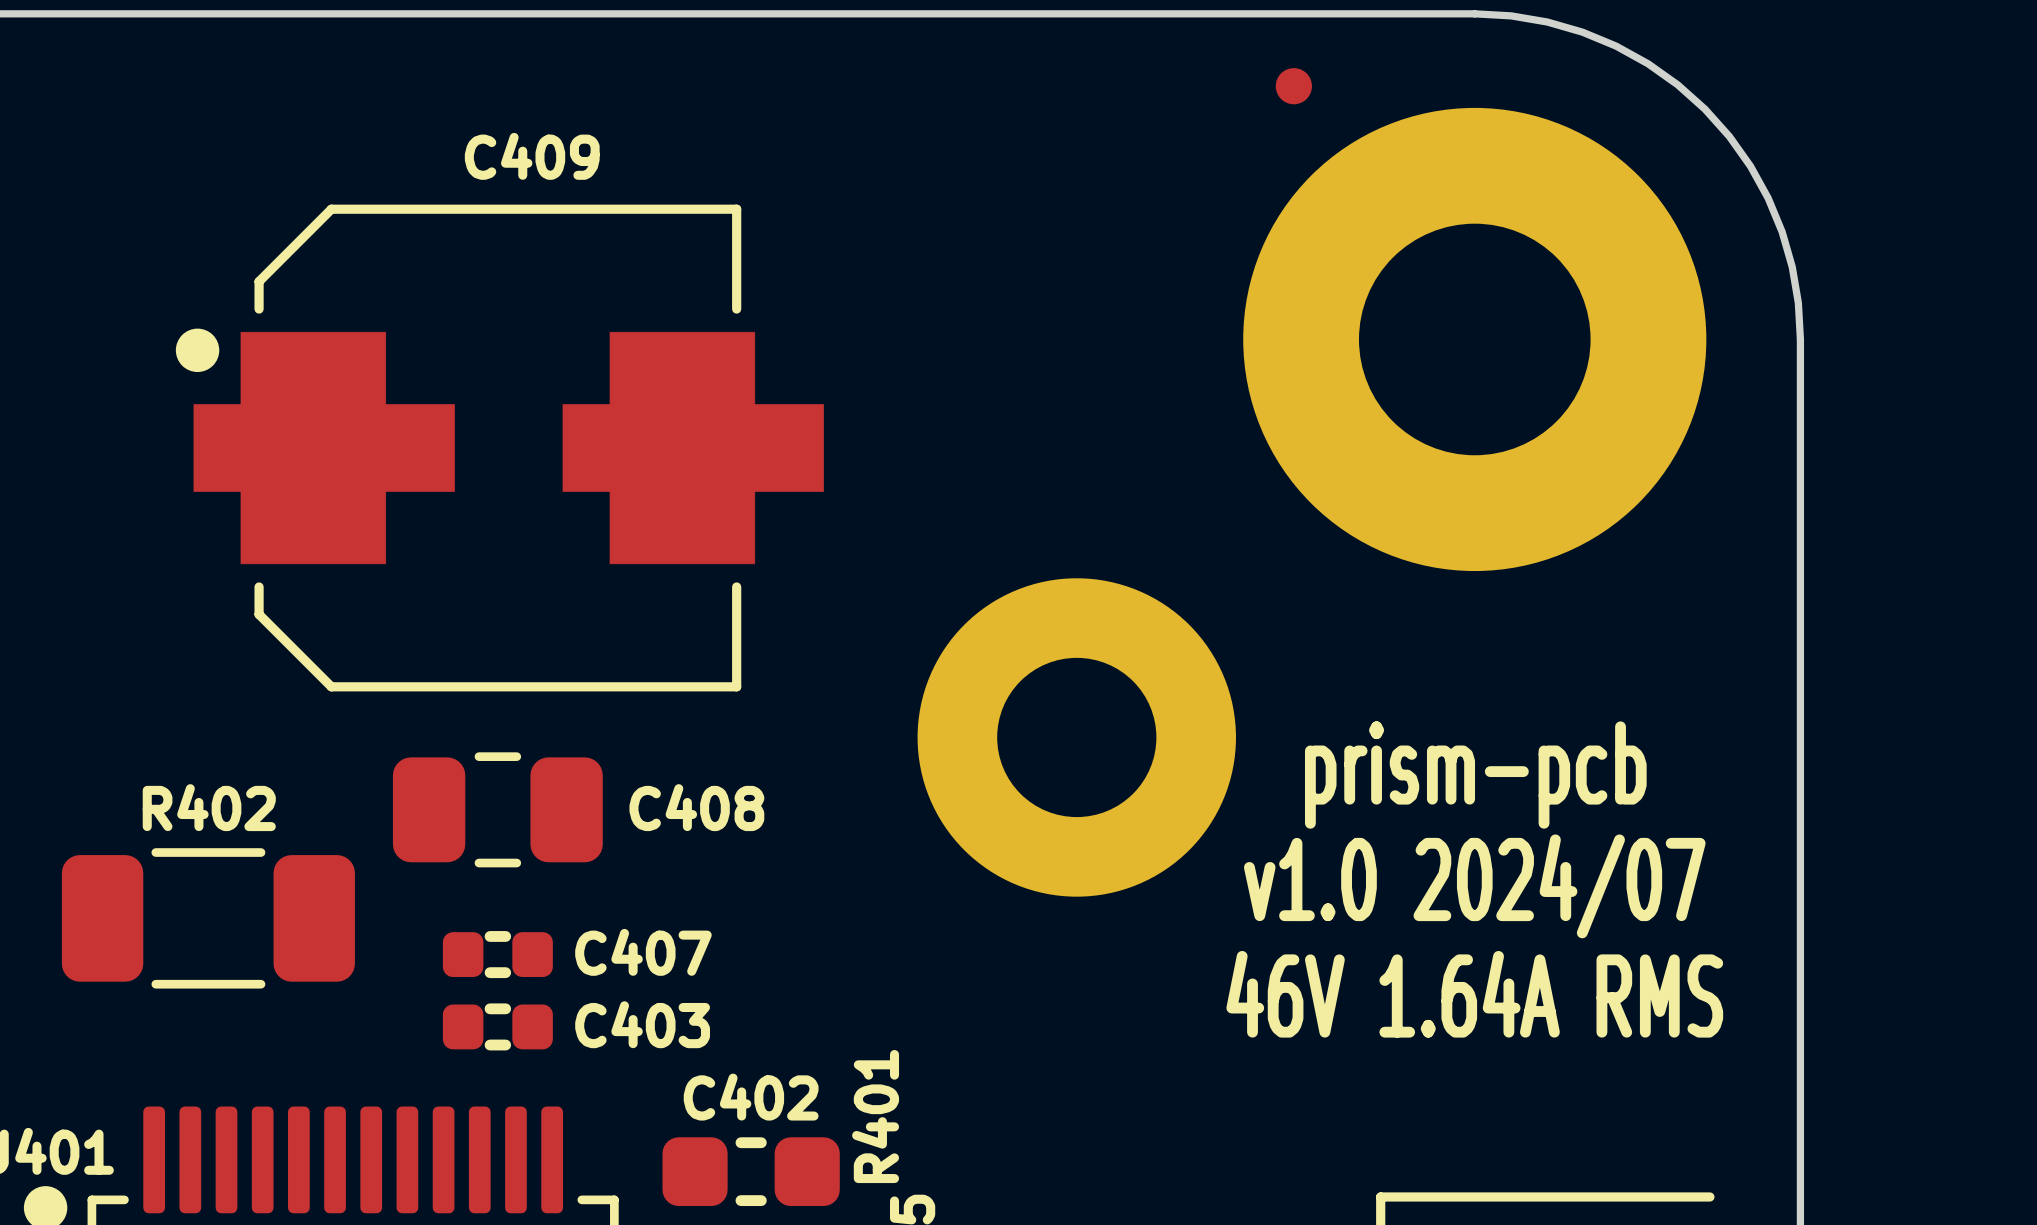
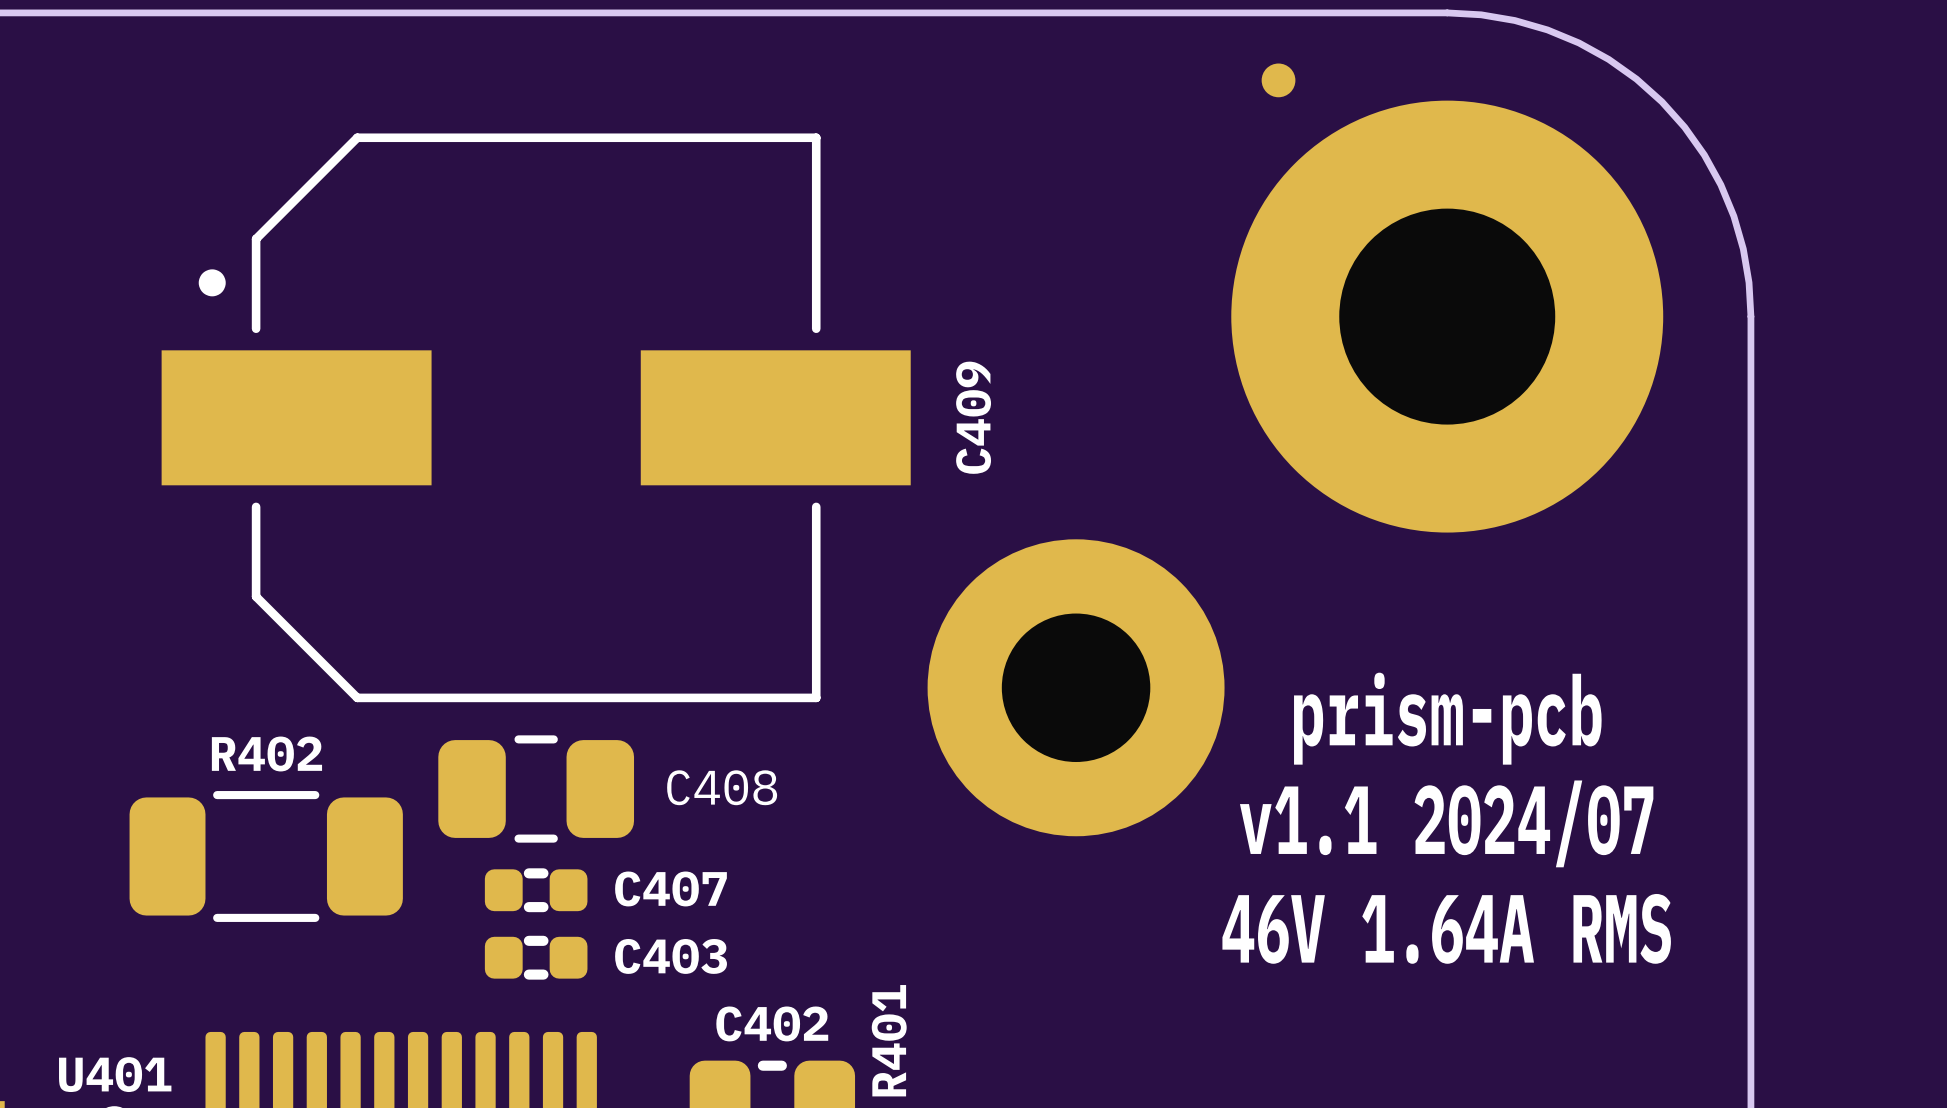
C409 name position: C409 (532, 156) -> C409 (973, 417)
C409 footprint: [175, 204, 824, 692] -> [161, 133, 911, 703]
C408 position: (497, 809) -> (536, 789)
text: v1.0 2024/07 (1474, 886) -> v1.1 2024/07 (1446, 823)

